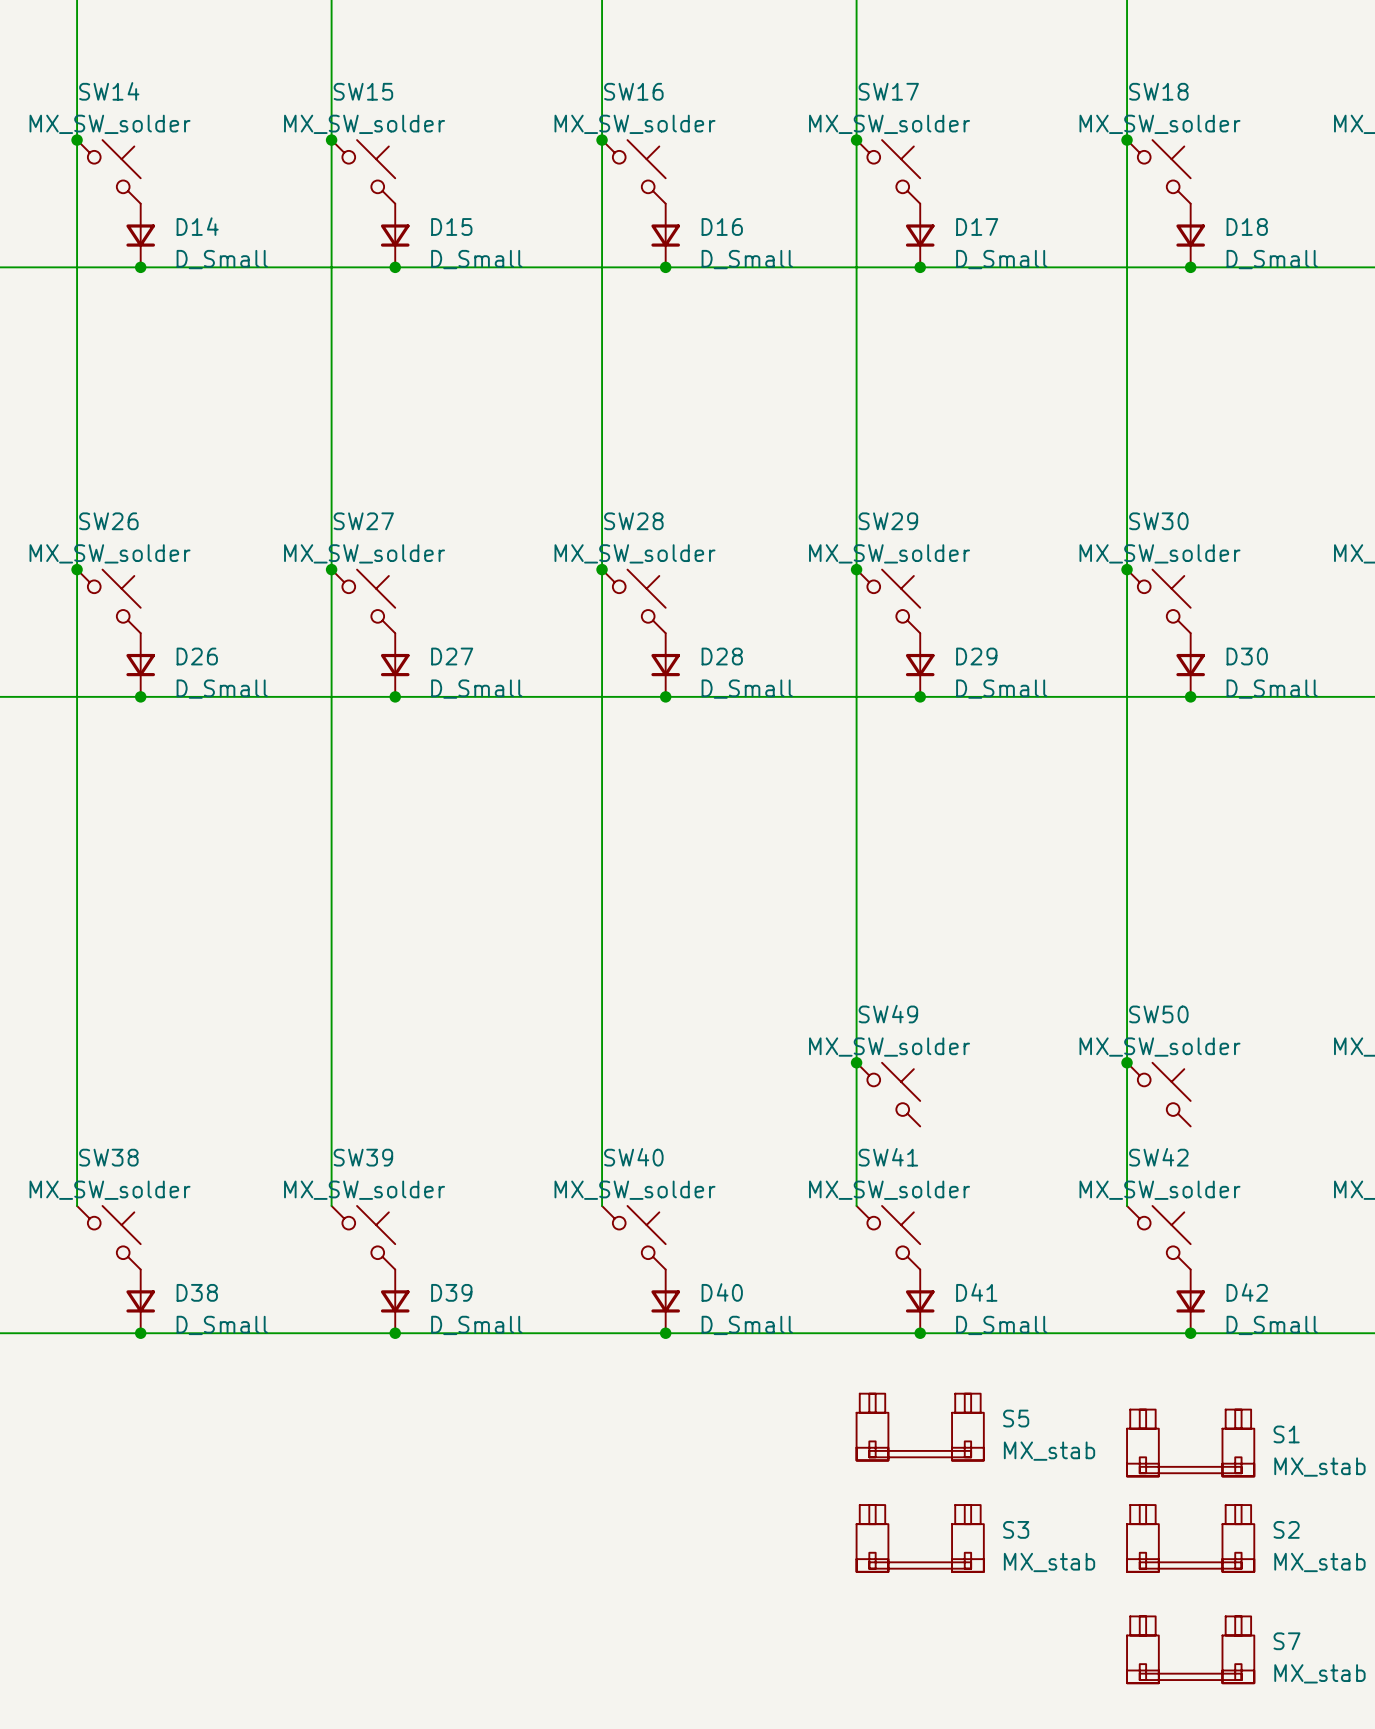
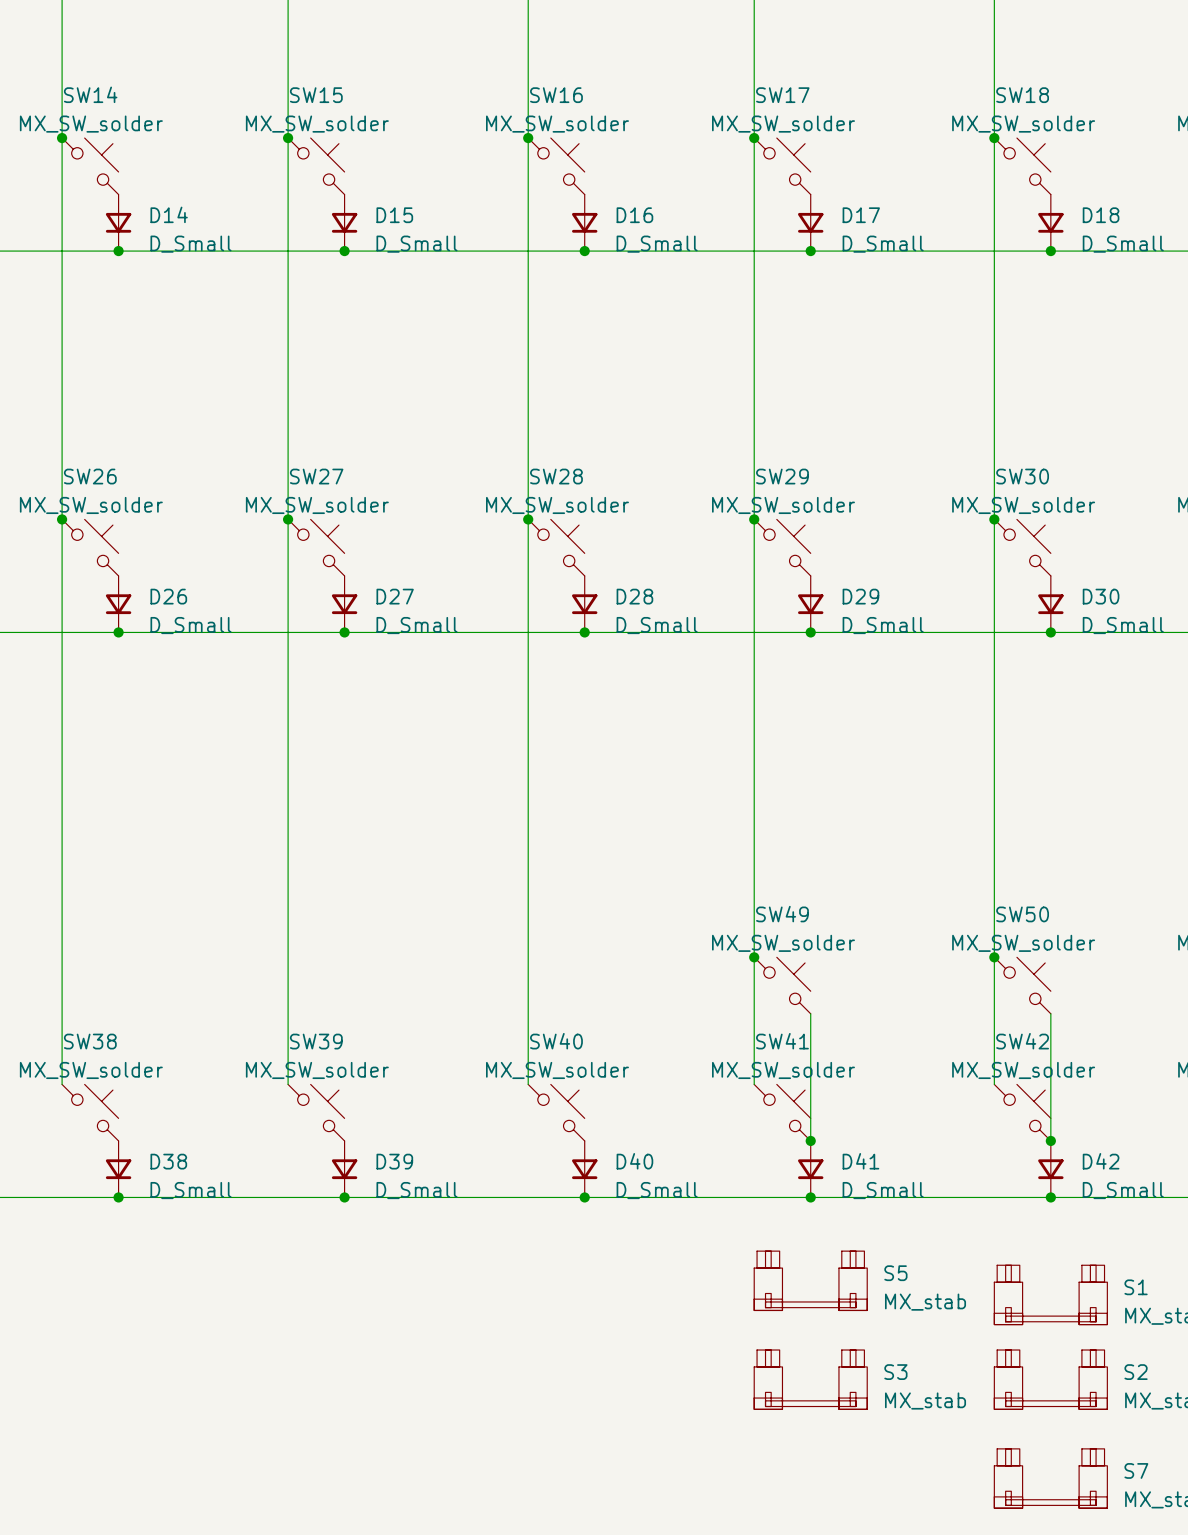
wire: none -> (810, 1013) (810, 1140)
wire: none -> (1050, 1013) (1050, 1140)
junction: none -> (810, 1140)
junction: none -> (1050, 1140)

